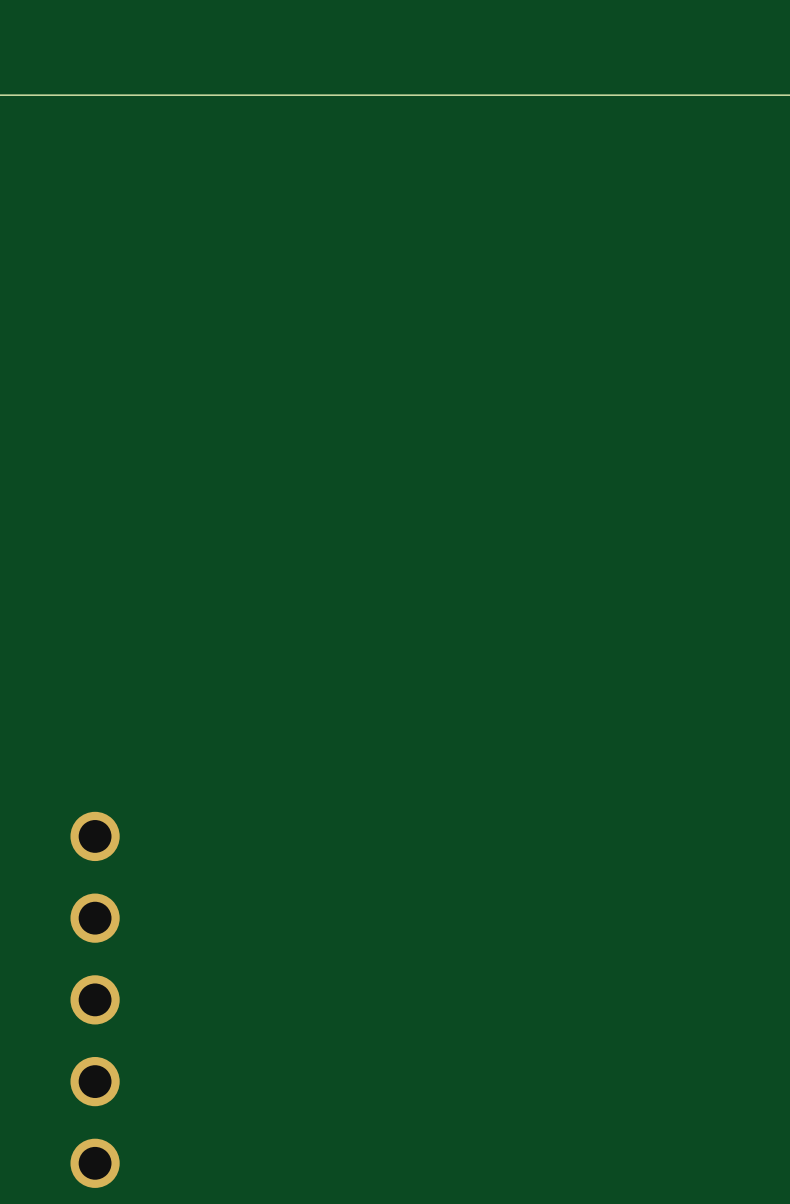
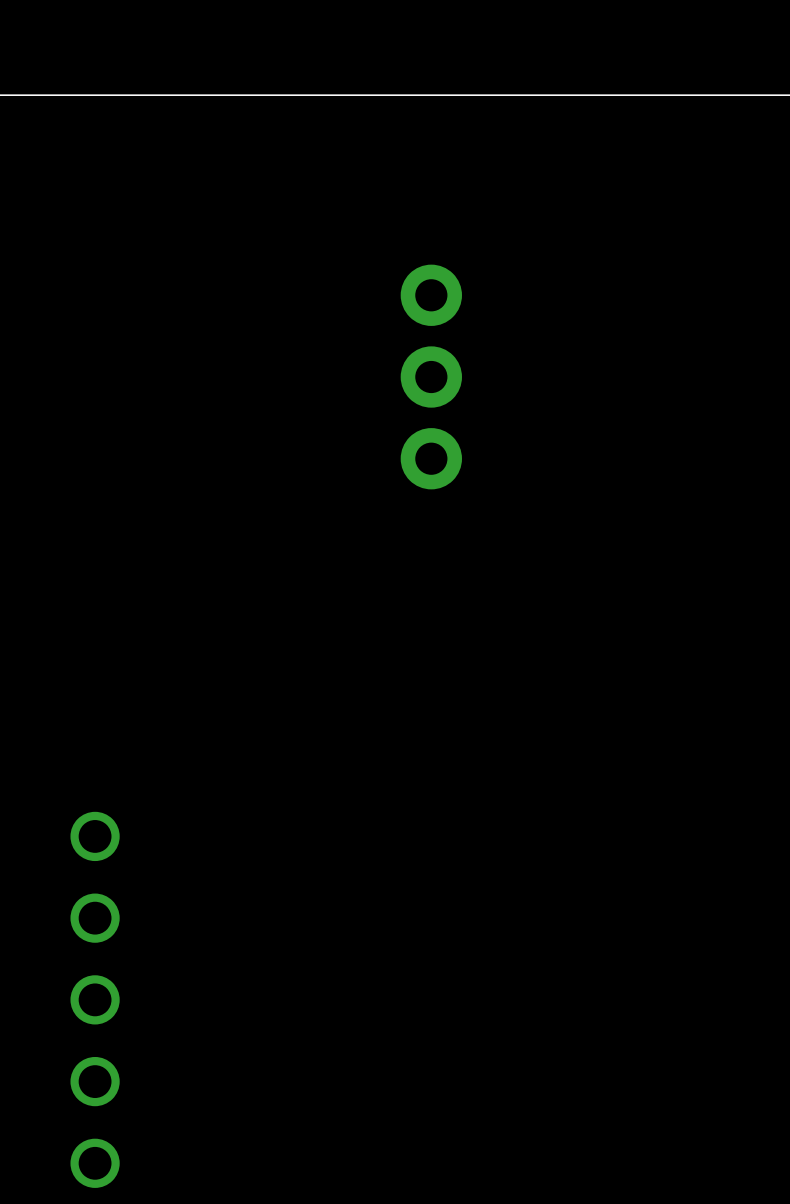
part: none -> (431, 377)

